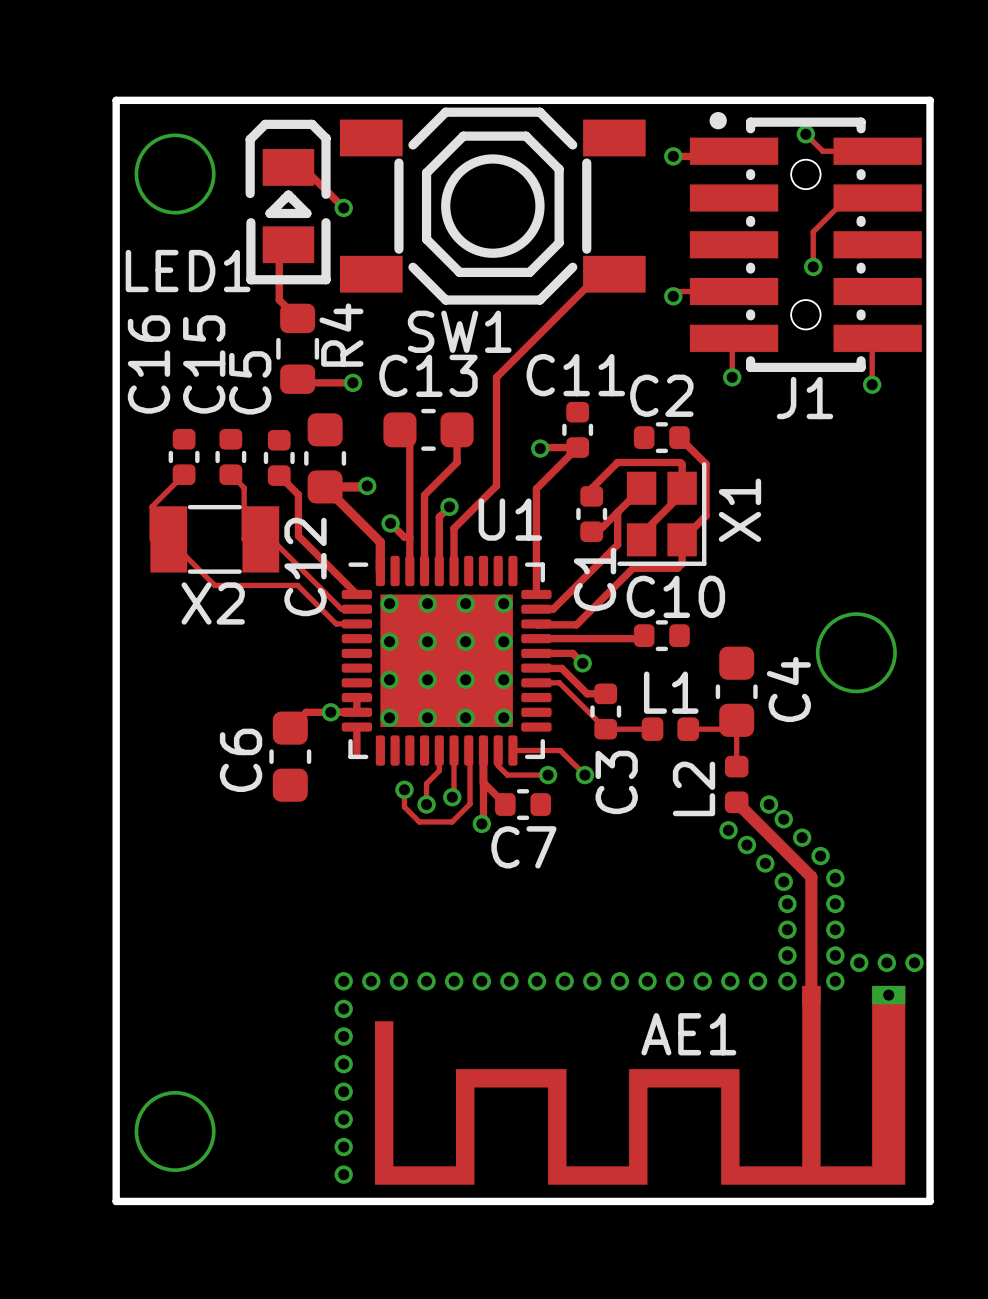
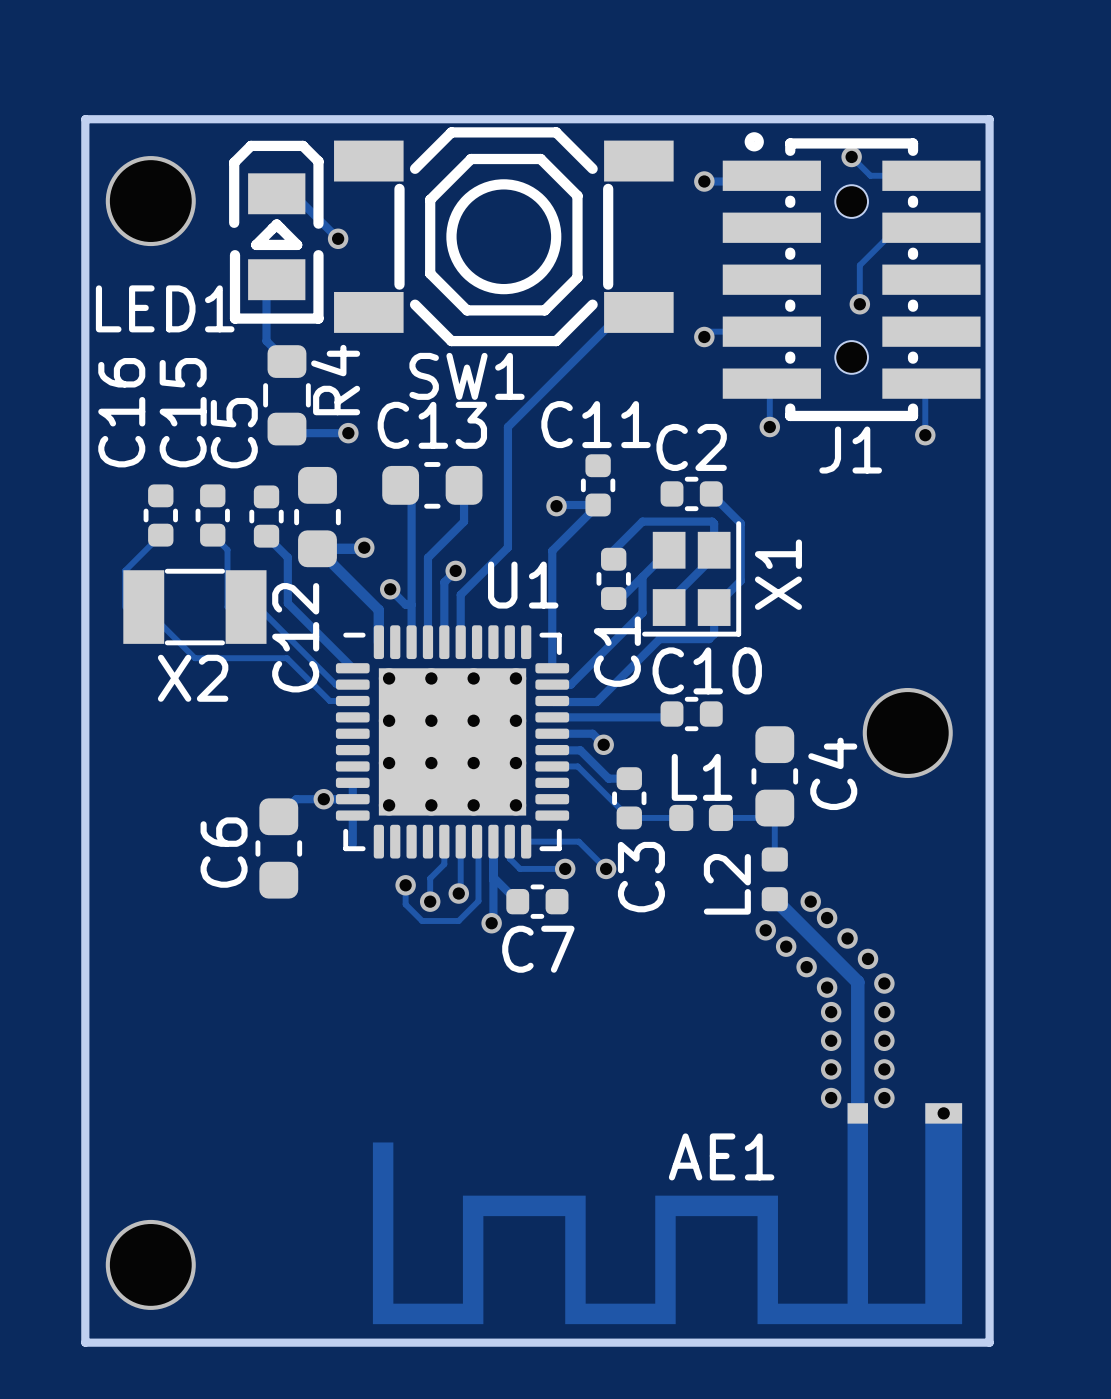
via: (859, 962) -> none
via: (886, 962) -> none
via: (914, 962) -> none
via: (343, 981) -> none
via: (371, 981) -> none
via: (398, 981) -> none
via: (426, 981) -> none
via: (454, 981) -> none
via: (481, 981) -> none
via: (509, 981) -> none
via: (537, 981) -> none
via: (564, 981) -> none
via: (592, 981) -> none
via: (619, 981) -> none
via: (647, 981) -> none
via: (675, 981) -> none
via: (702, 981) -> none
via: (730, 981) -> none
via: (757, 981) -> none
via: (343, 1008) -> none
via: (343, 1036) -> none
via: (343, 1064) -> none
via: (343, 1091) -> none
via: (343, 1119) -> none
via: (343, 1147) -> none
via: (343, 1174) -> none

